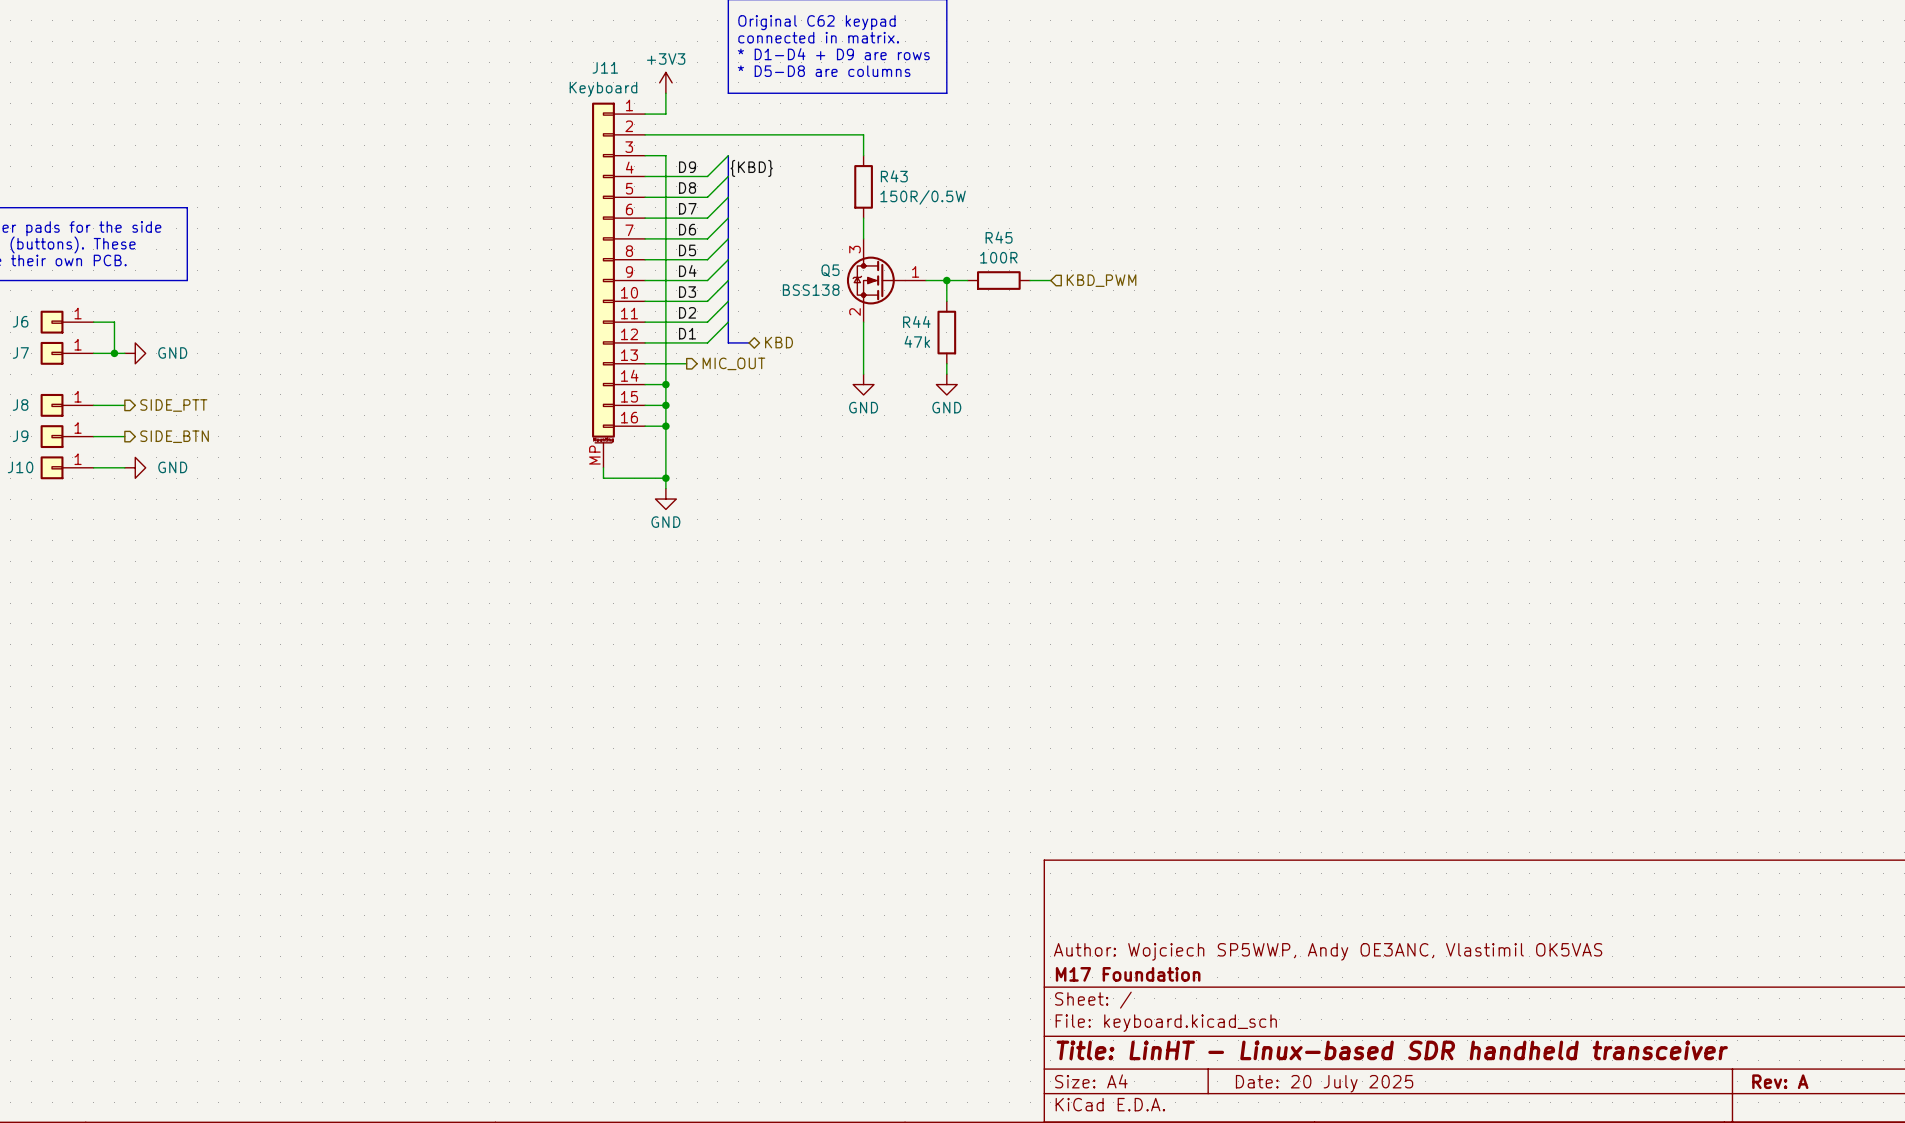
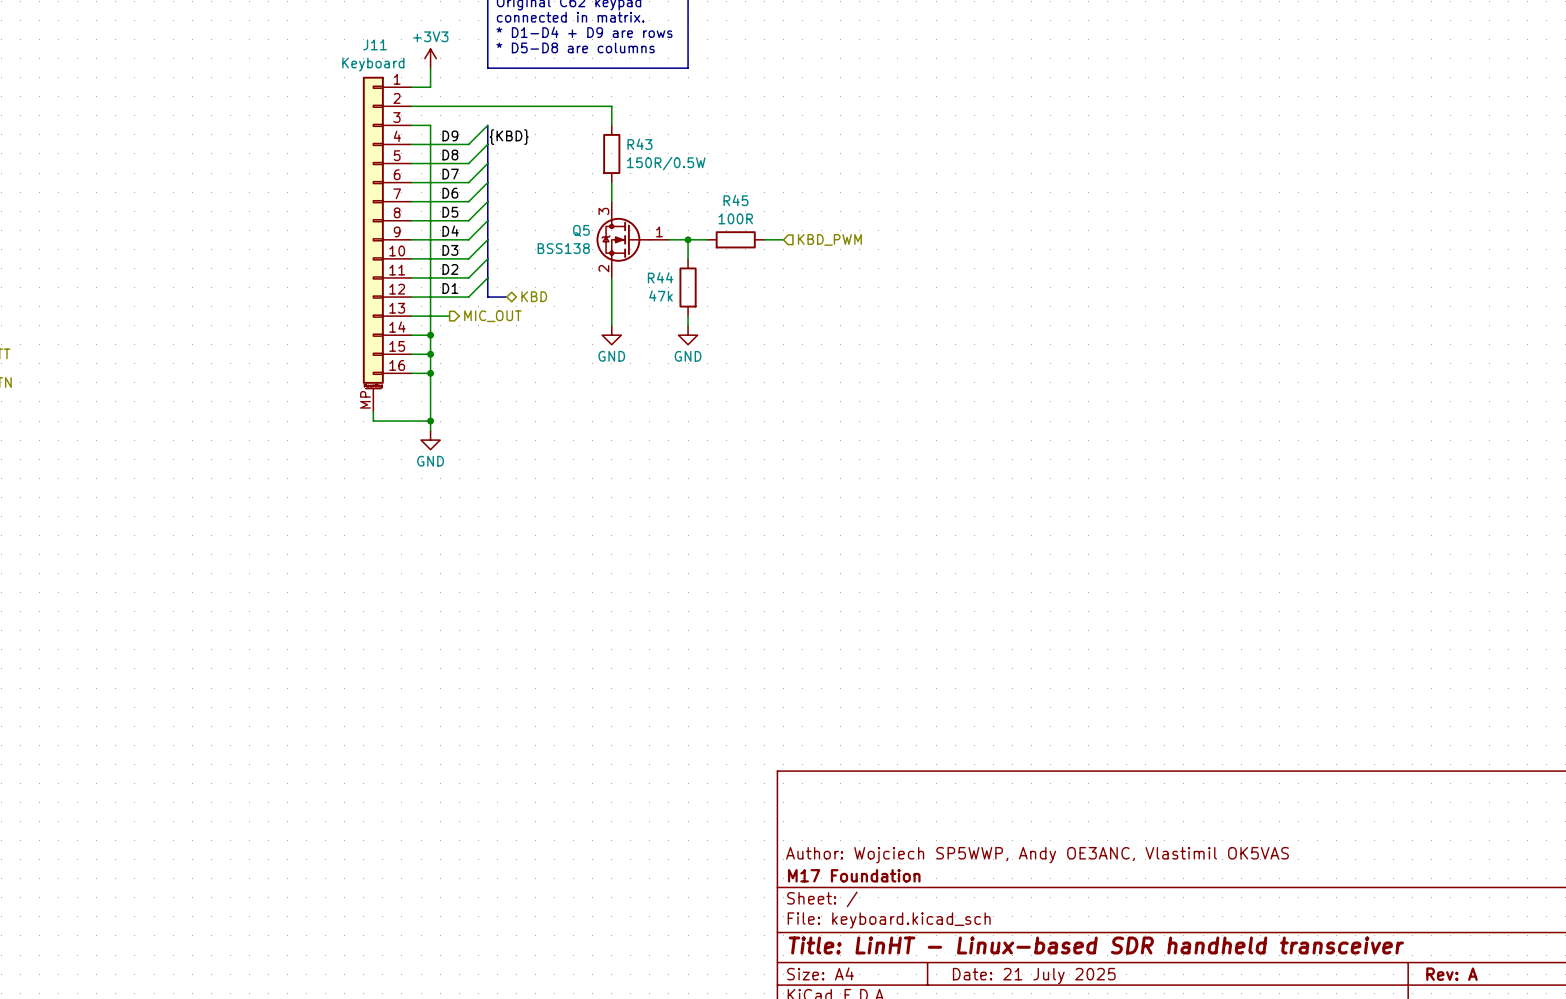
title block: Date: 20 July 2025 (1324, 1083) -> Date: 21 July 2025 (1034, 976)

